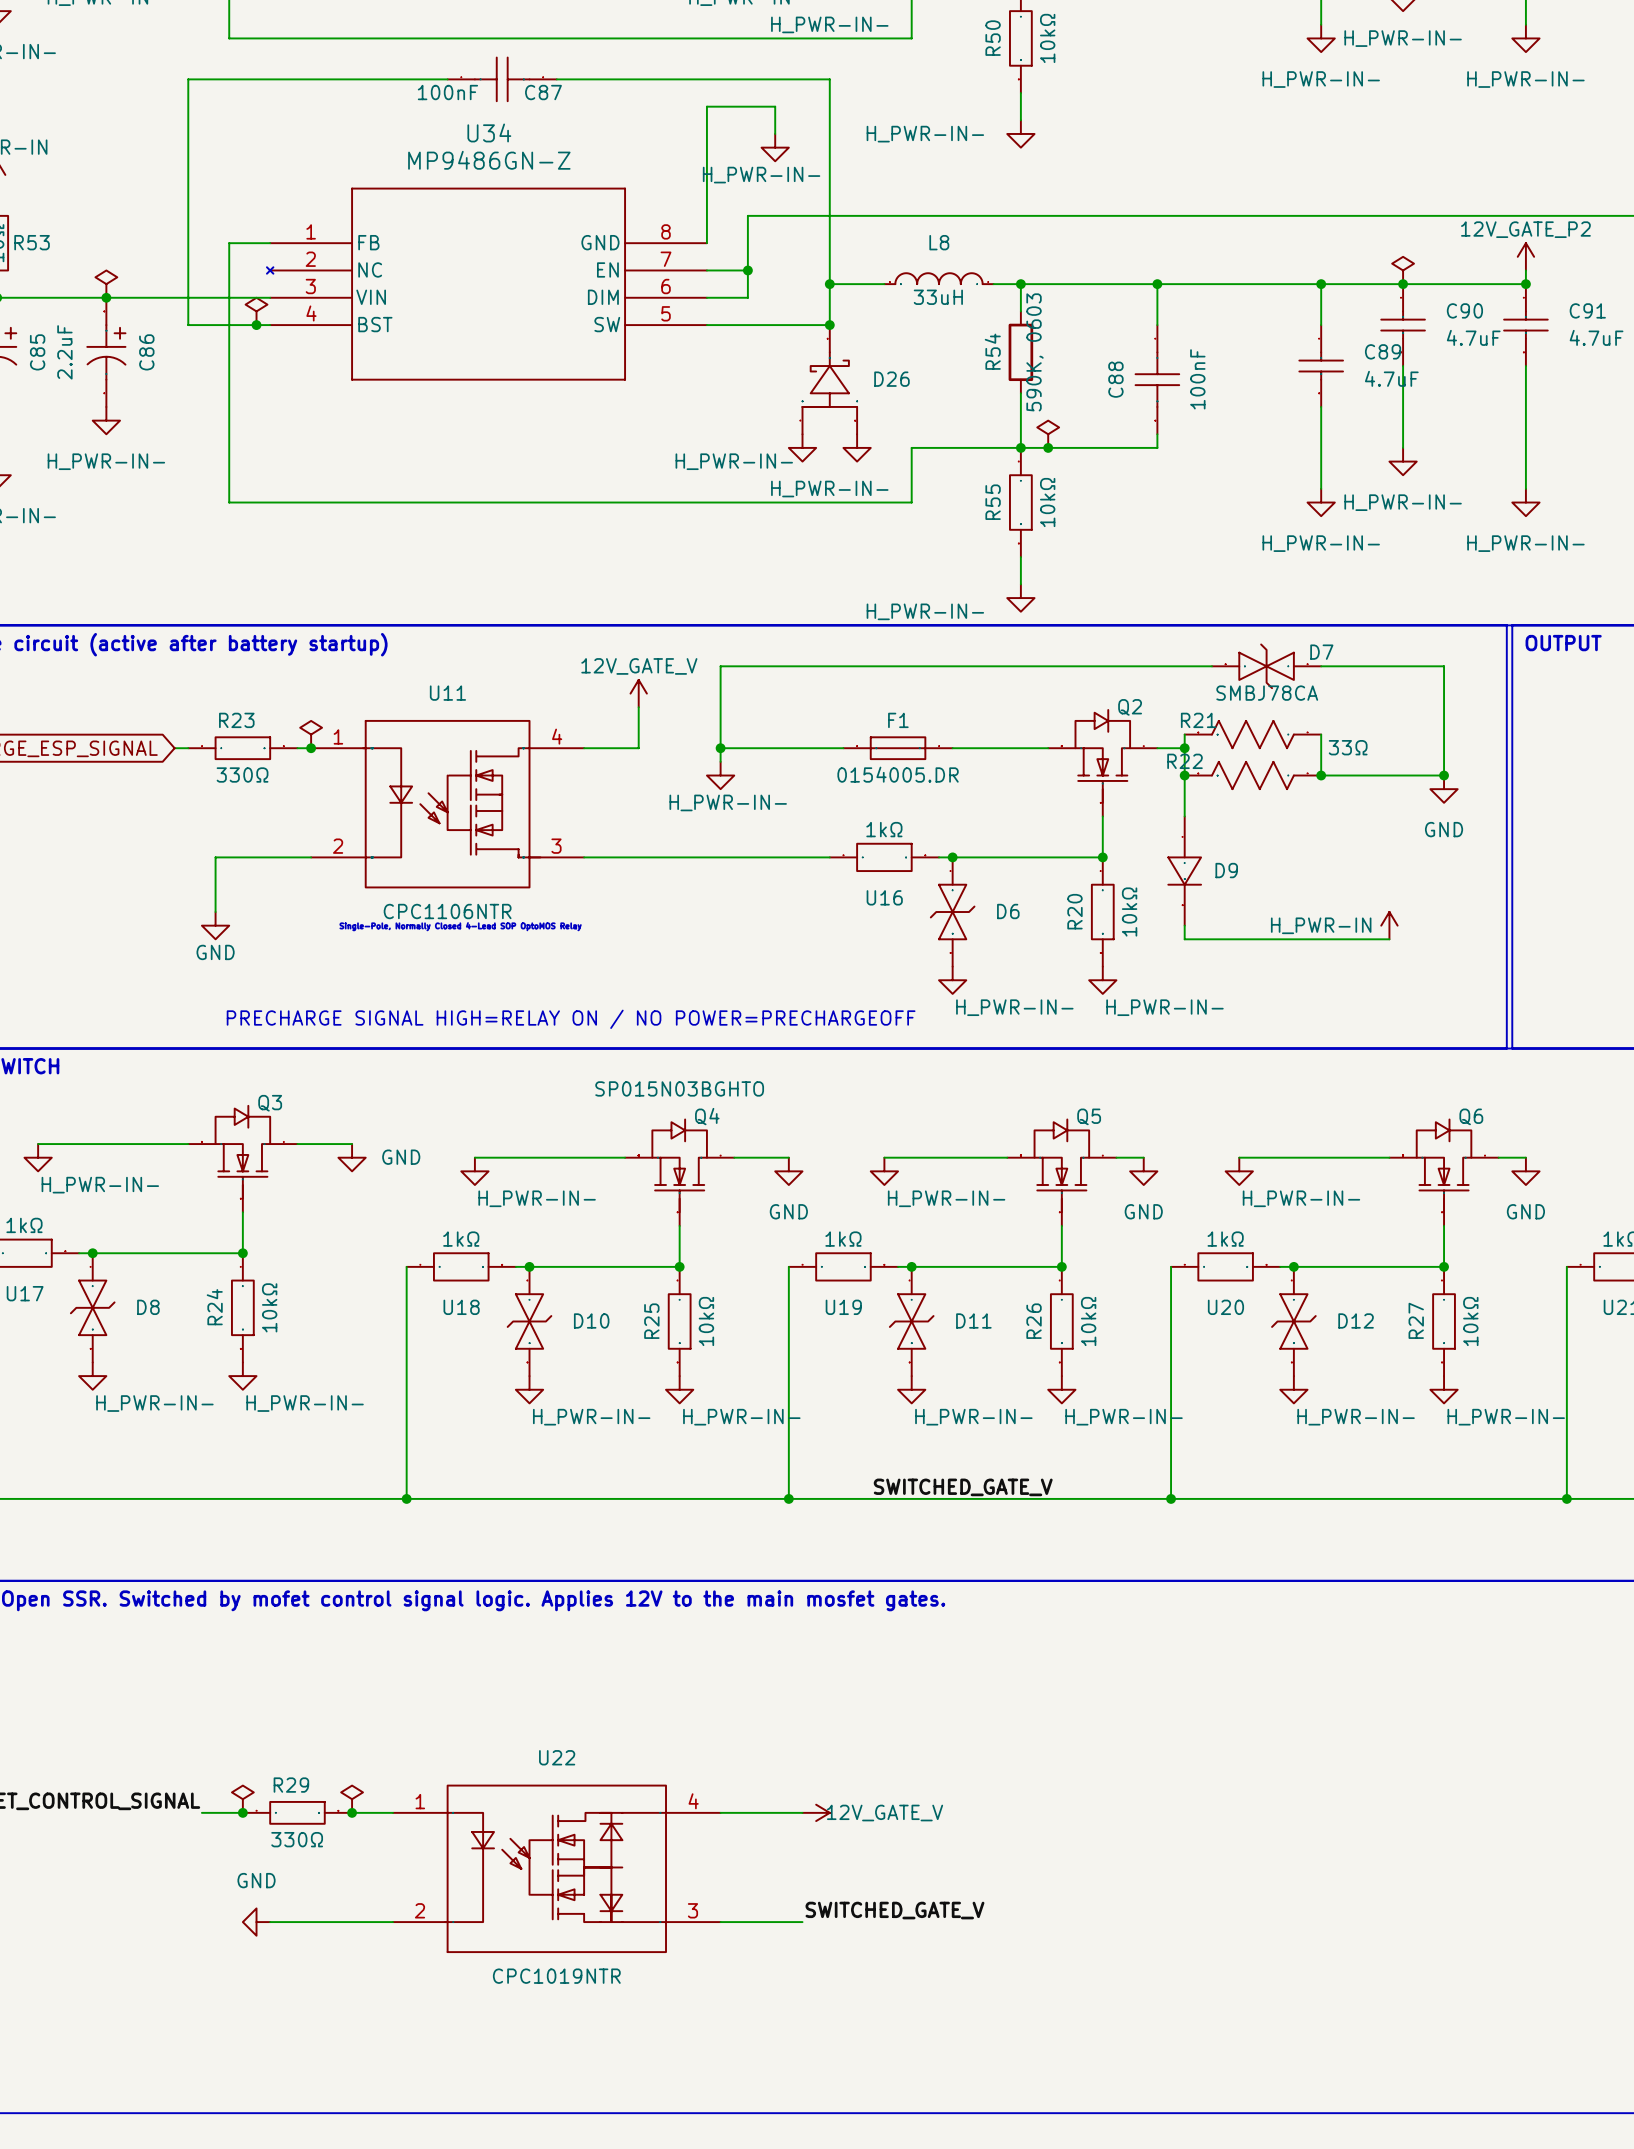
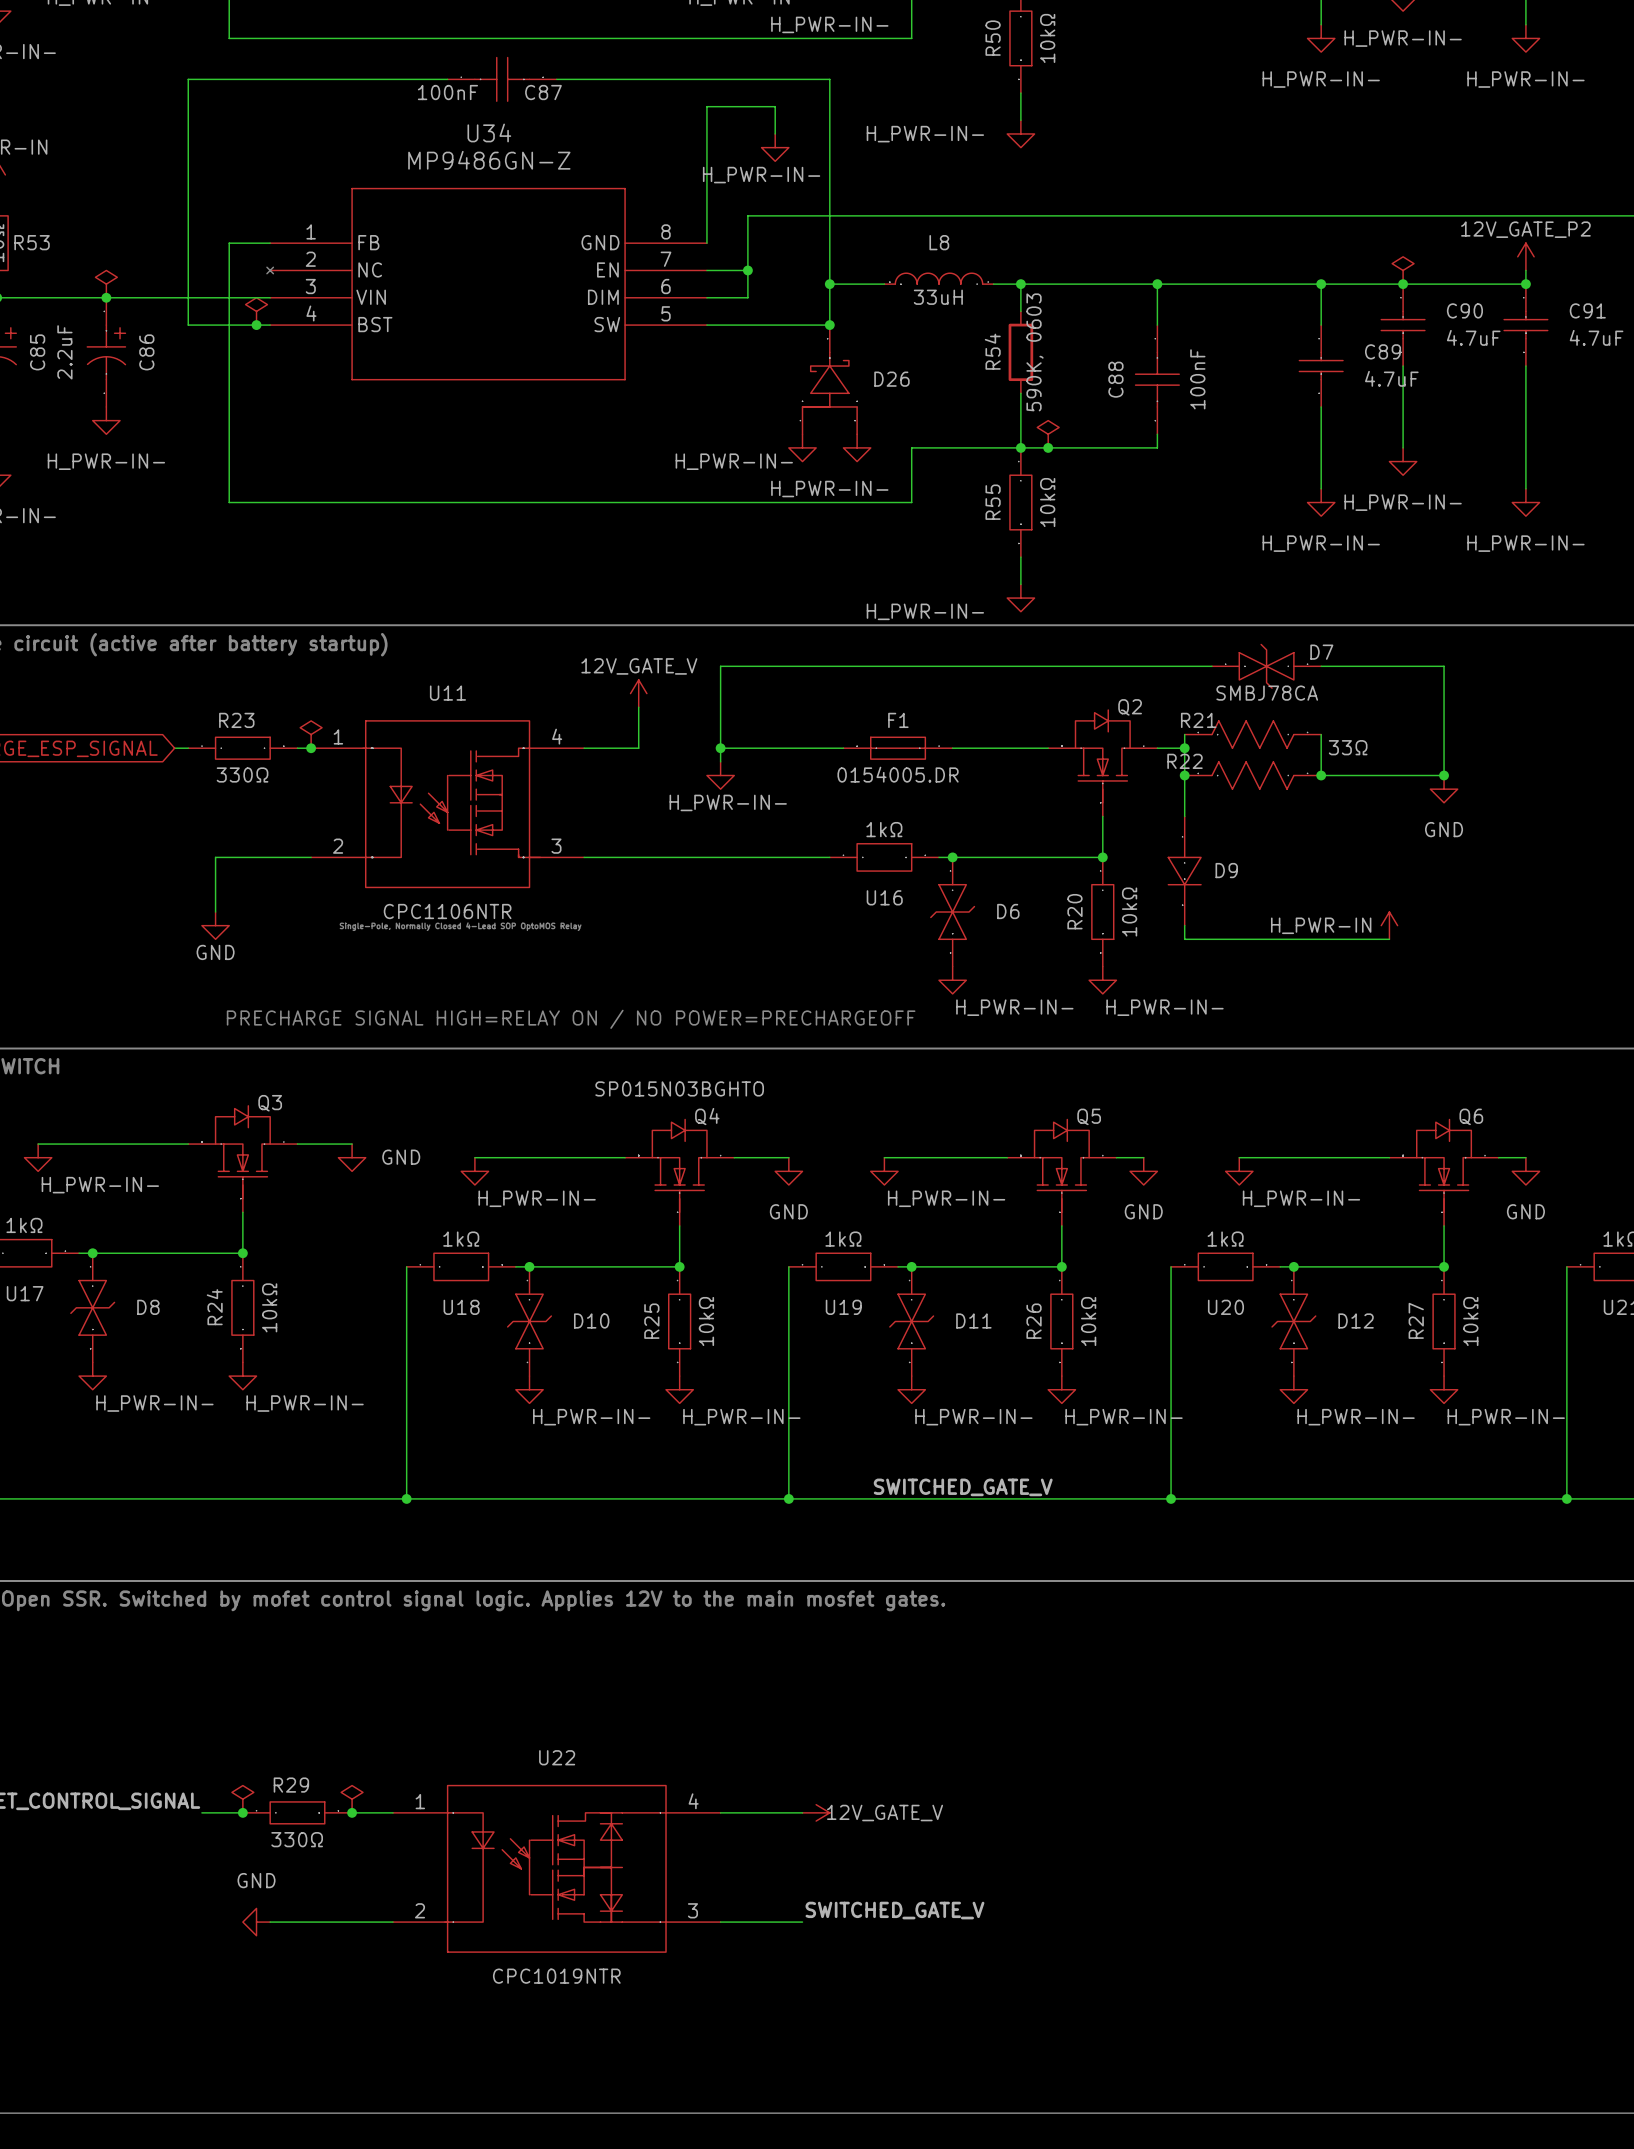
line: (1506, 625) (1506, 1048) -> none
line: (1512, 625) (1512, 1048) -> none
text: OUTPUT (1563, 643) -> none

